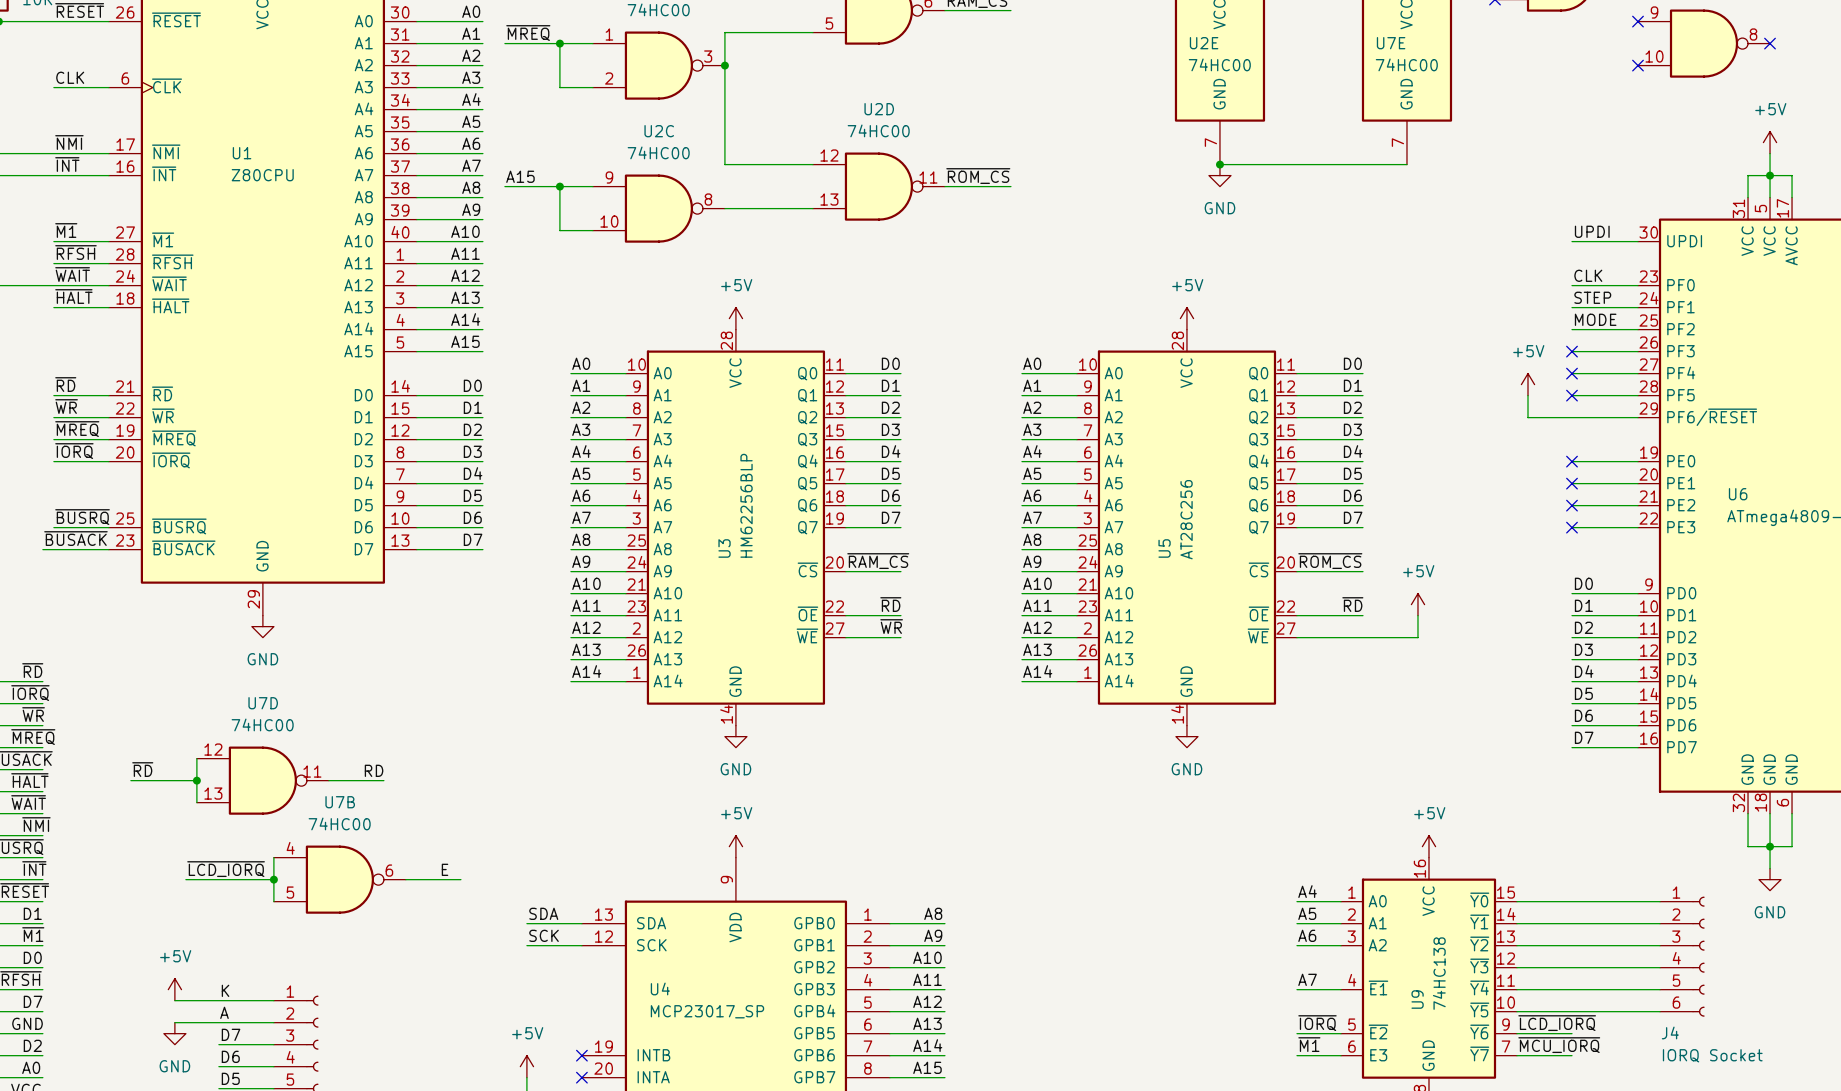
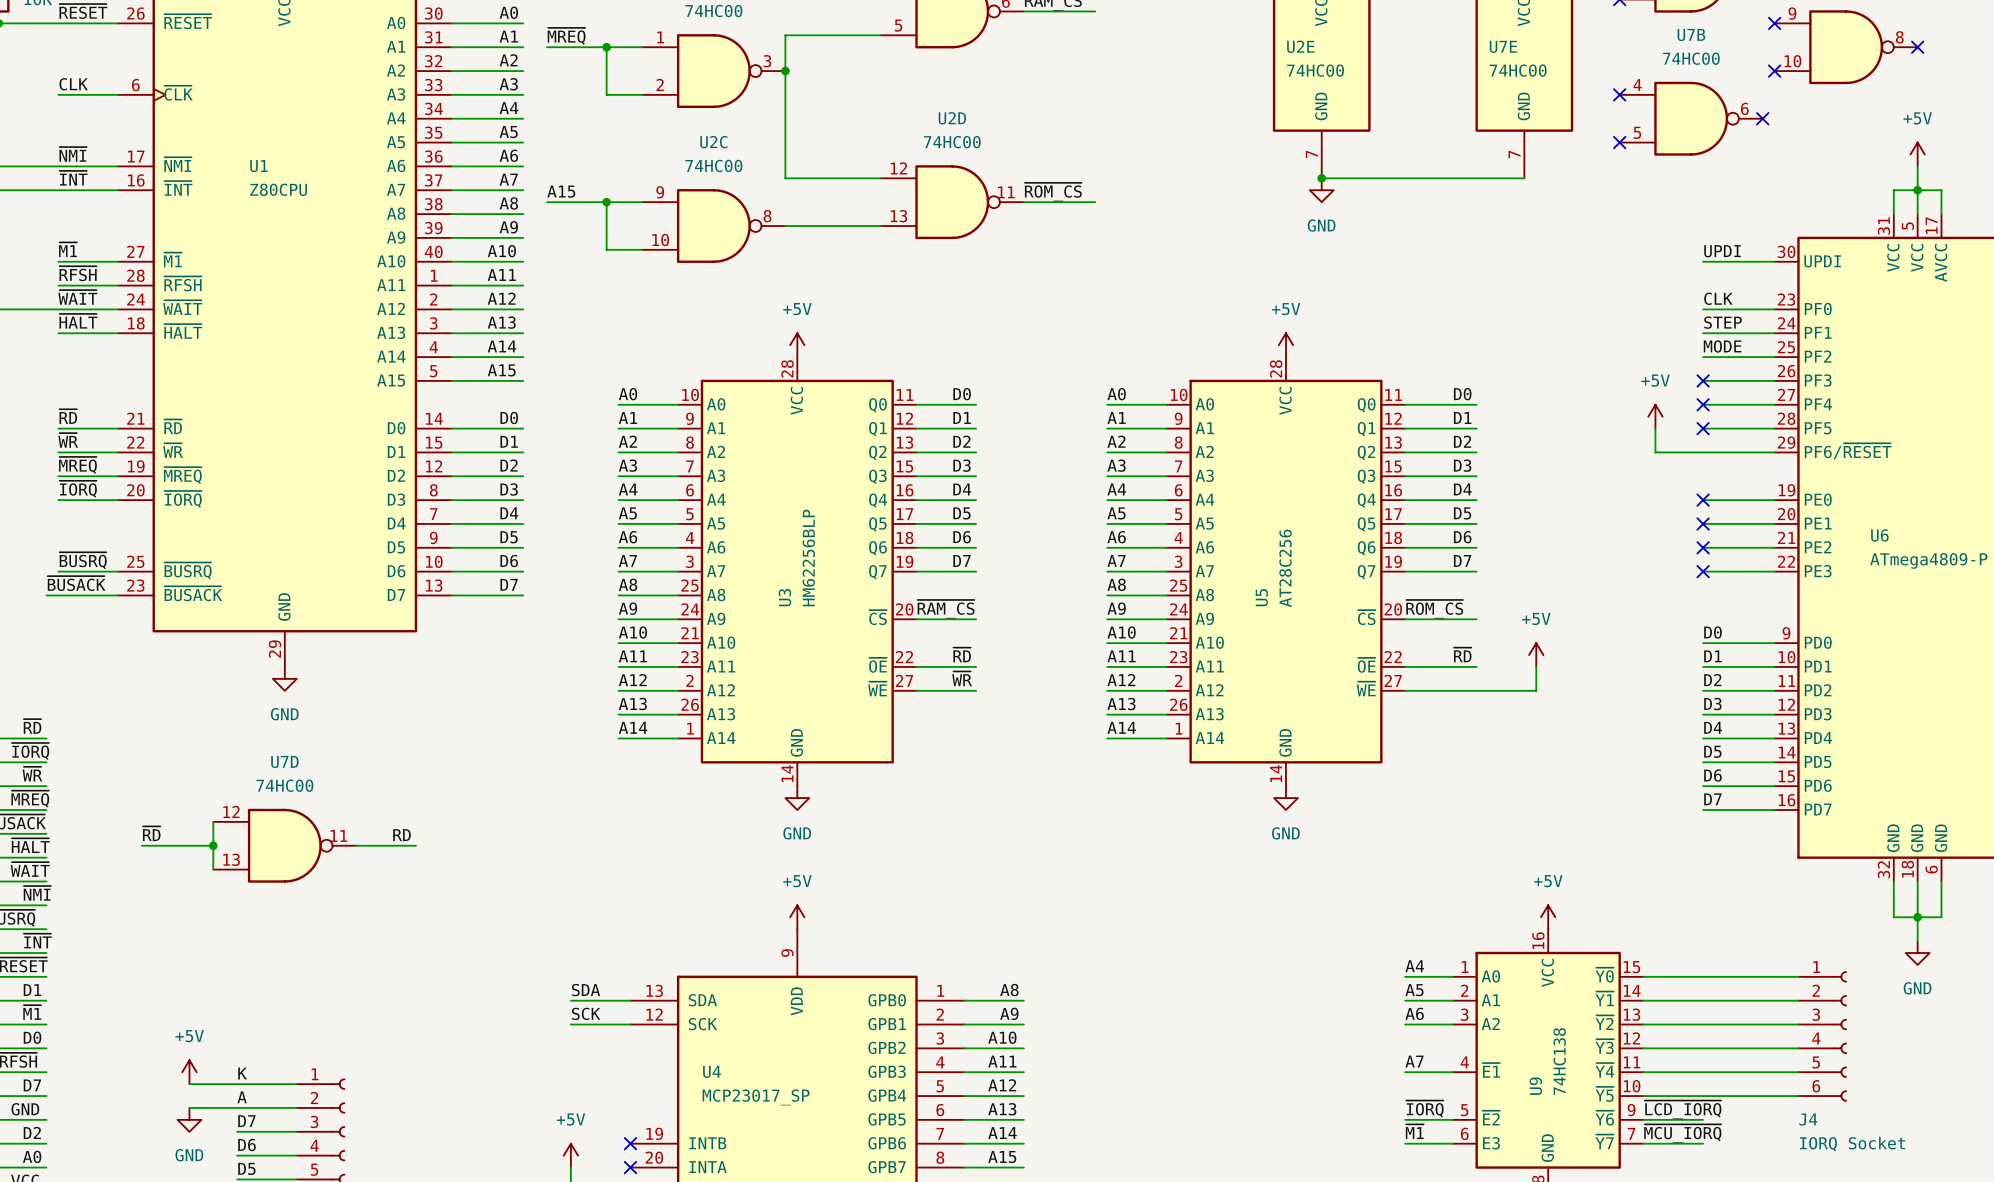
no-connect mark: none -> (1619, 94)
no-connect mark: none -> (1762, 118)
no-connect mark: none -> (1619, 142)
wire: (273, 857) (273, 901) -> none
label: ~{LCD_IORQ} (226, 869) -> none
label: E (445, 869) -> none
wire: (185, 879) (273, 879) -> none
junction: (273, 879) -> none
U7B position: (339, 879) -> (1691, 118)
wire: (405, 879) (460, 879) -> none

